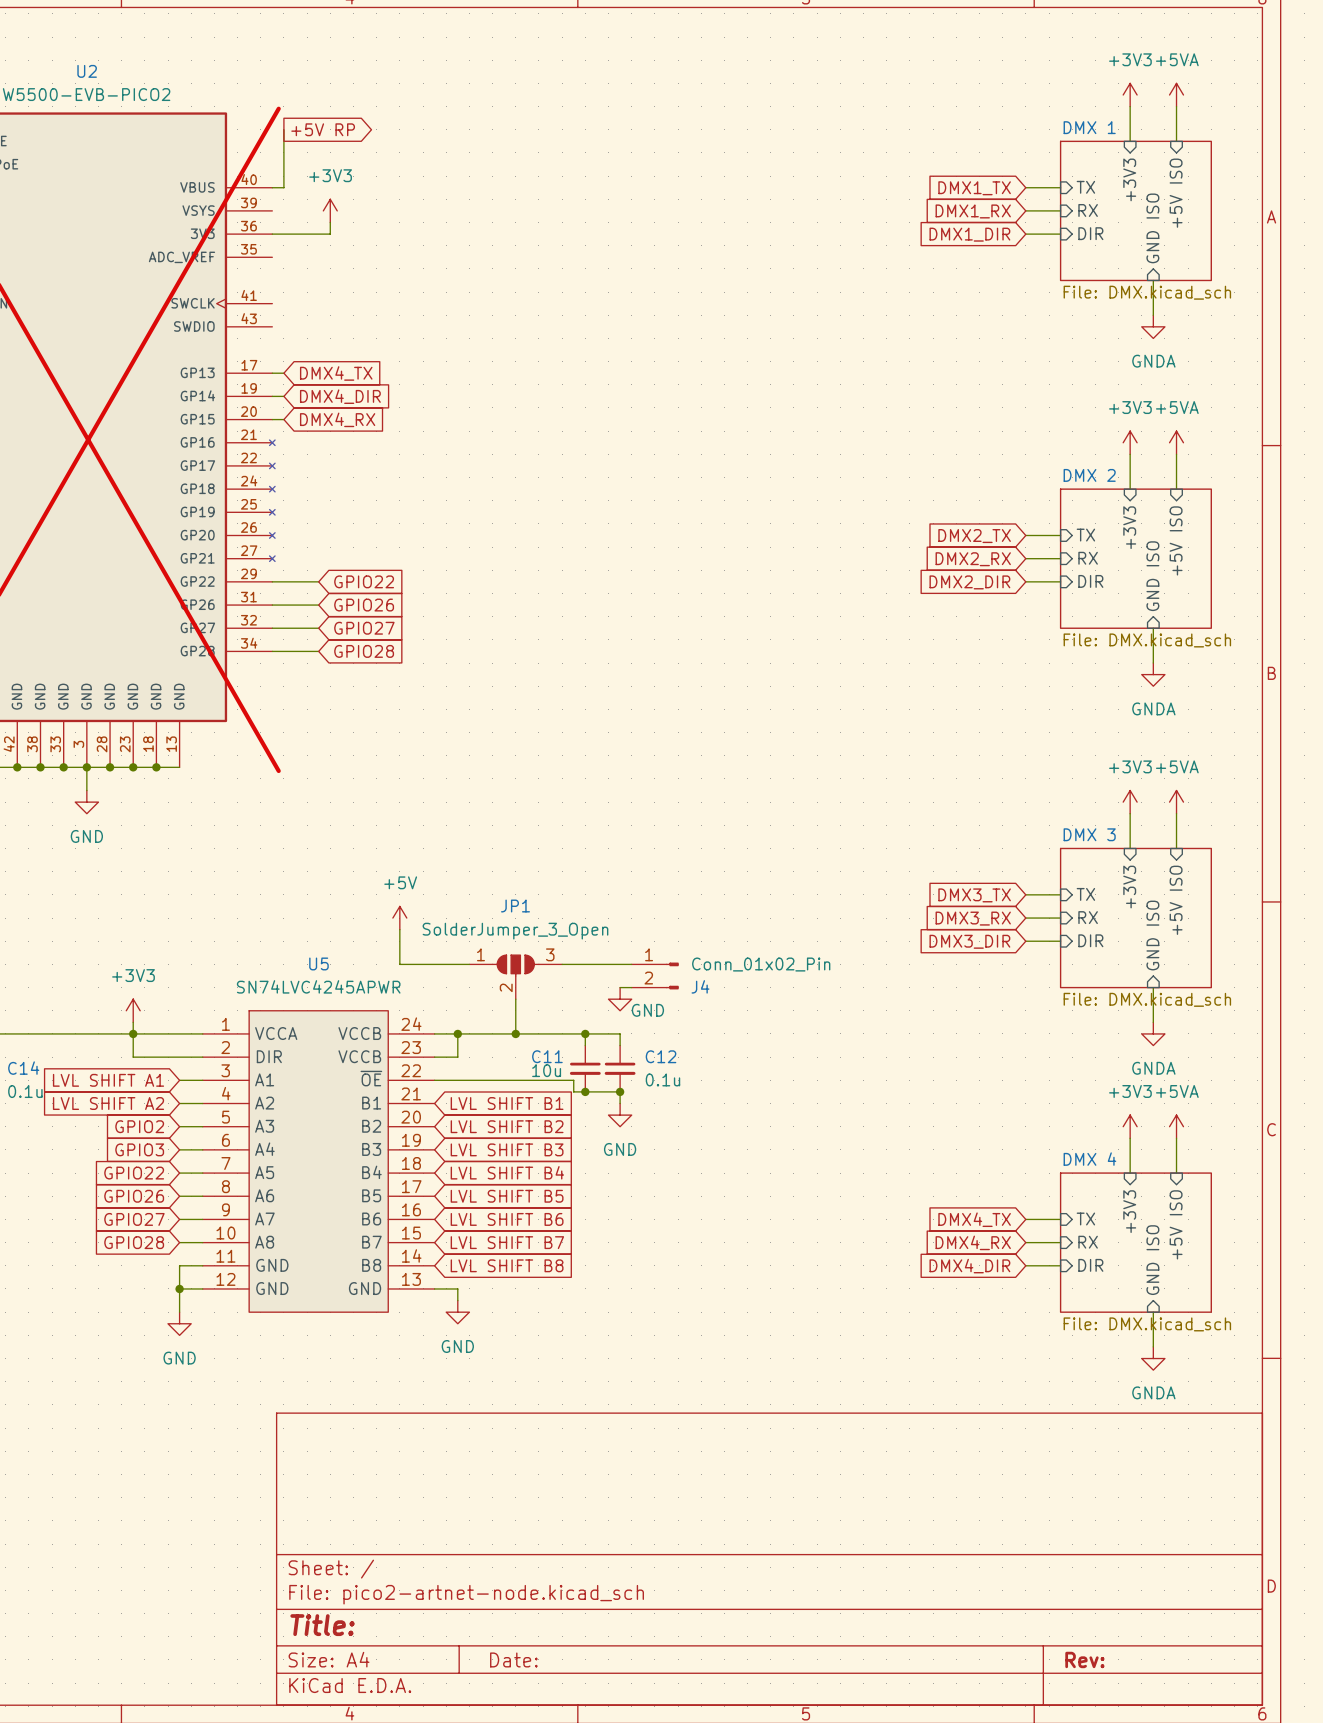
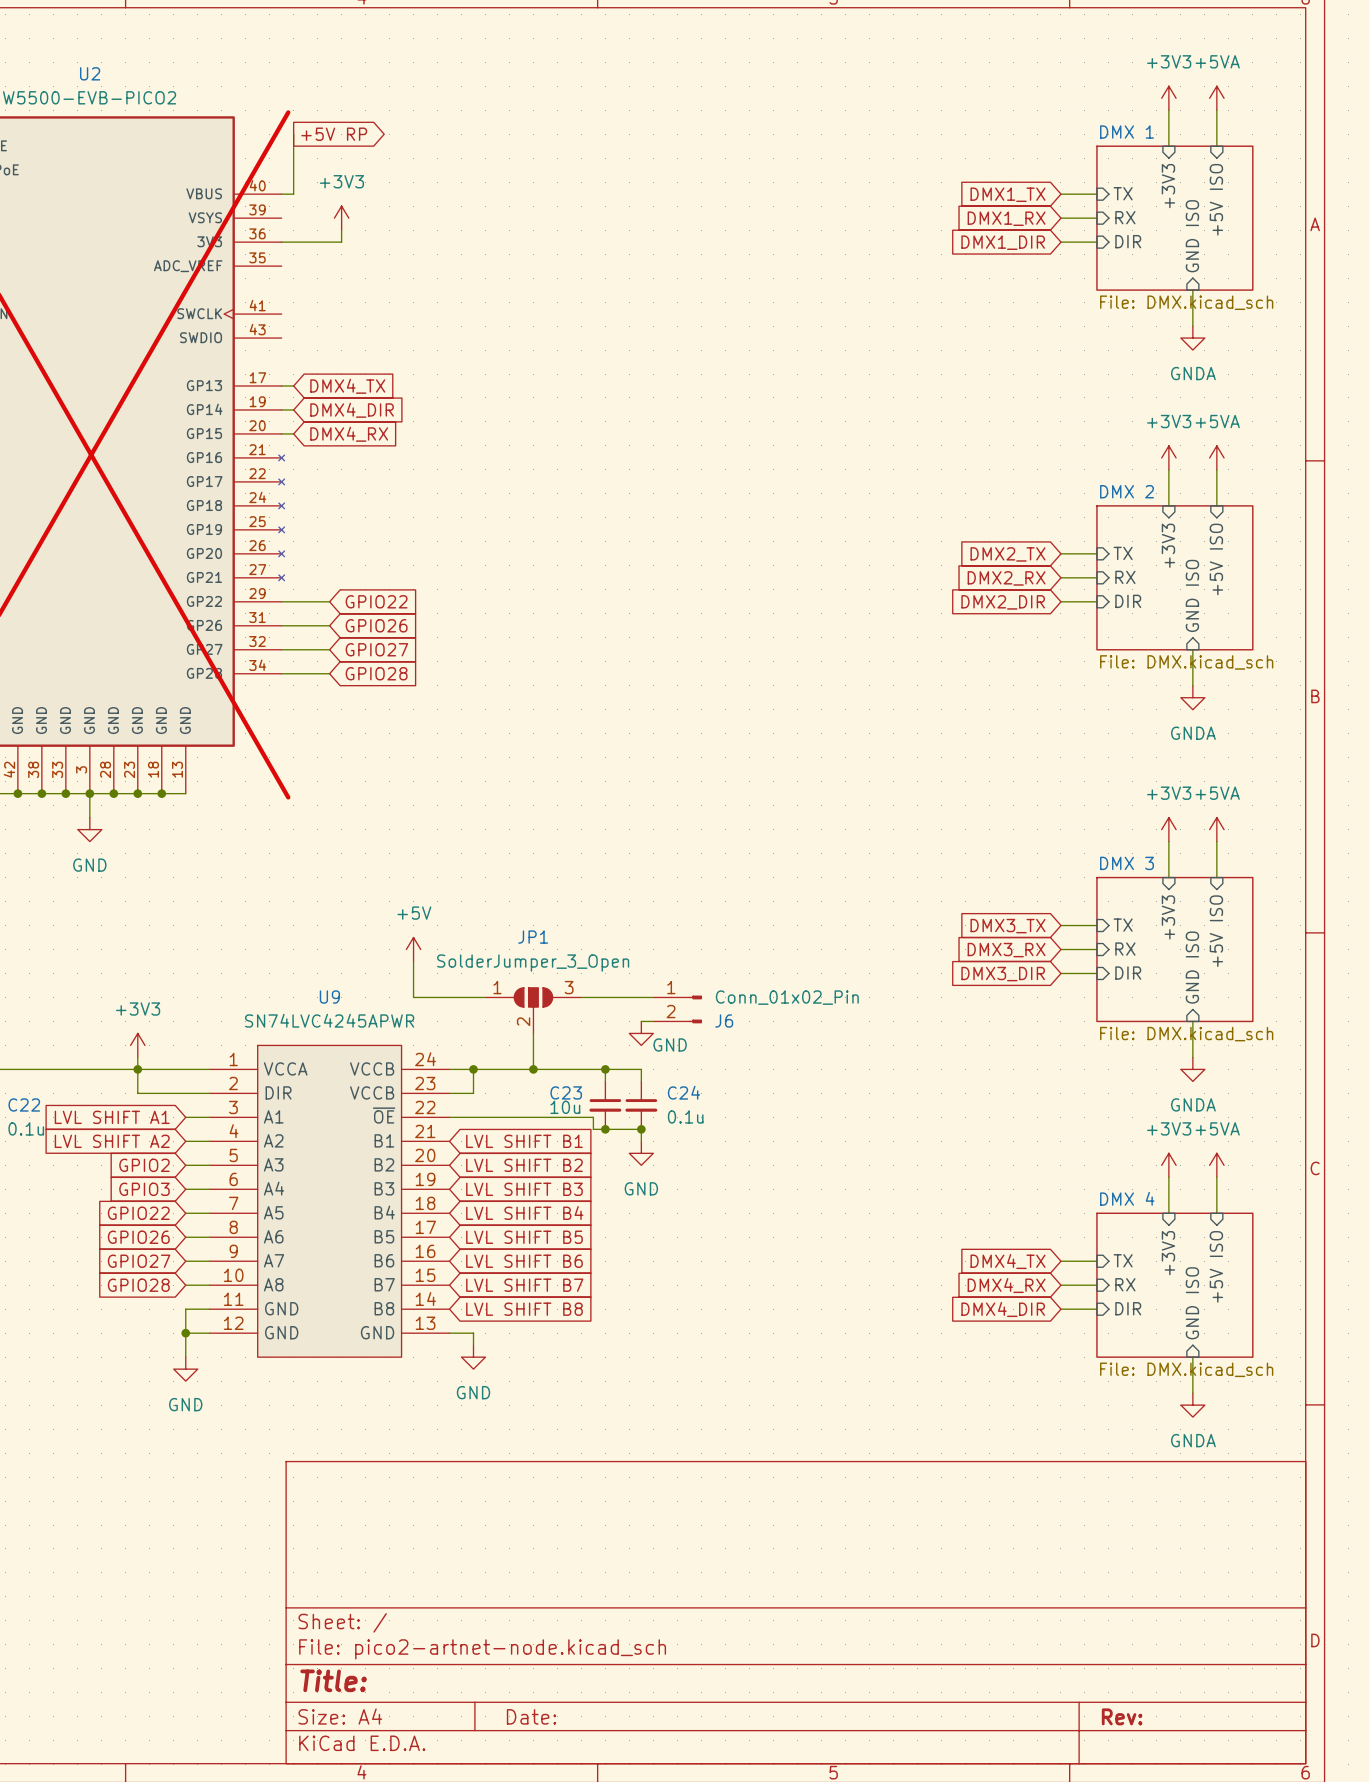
U5 name: U5 (318, 963) -> U9 (329, 997)
J4 name: J4 (700, 986) -> J6 (724, 1021)
C11 name: C11 (547, 1056) -> C23 (566, 1092)
C12 name: C12 (661, 1056) -> C24 (683, 1092)
C14 name: C14 (23, 1068) -> C22 (24, 1104)

